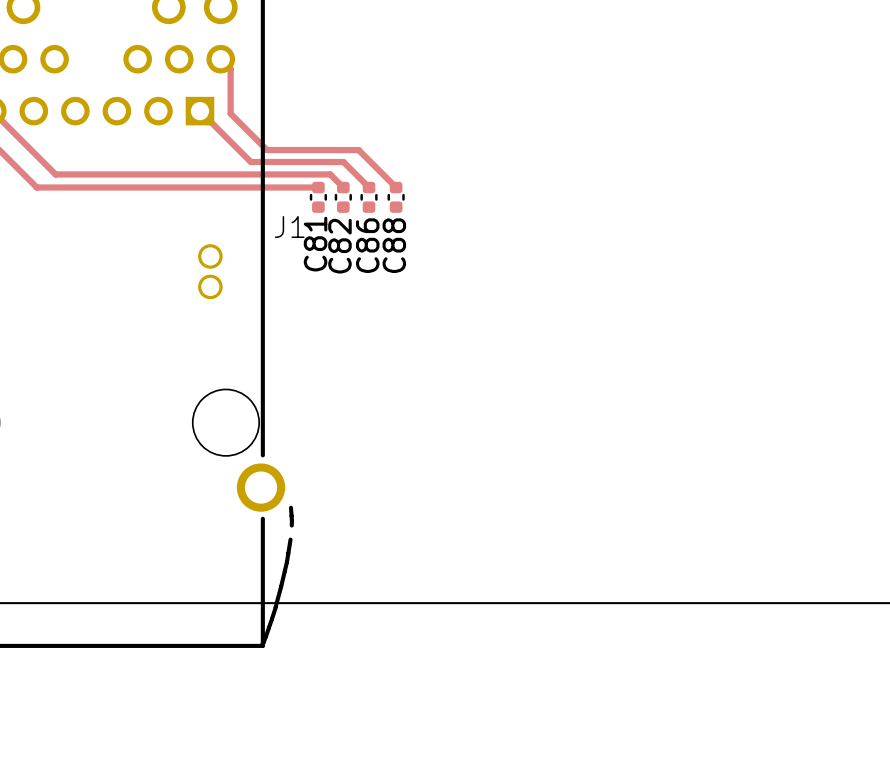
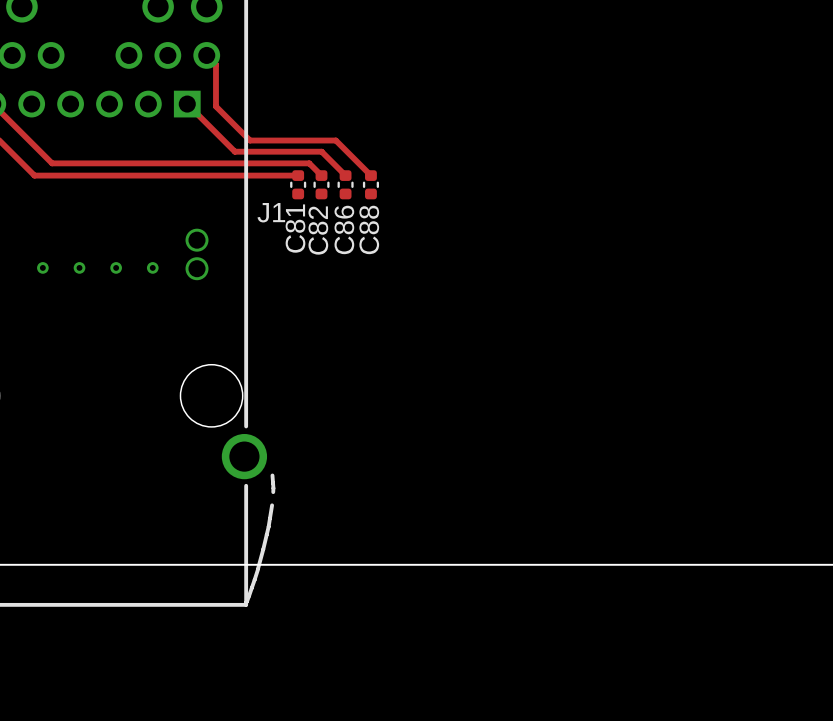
via: none -> (42, 267)
via: none -> (79, 267)
via: none -> (116, 267)
via: none -> (152, 267)

